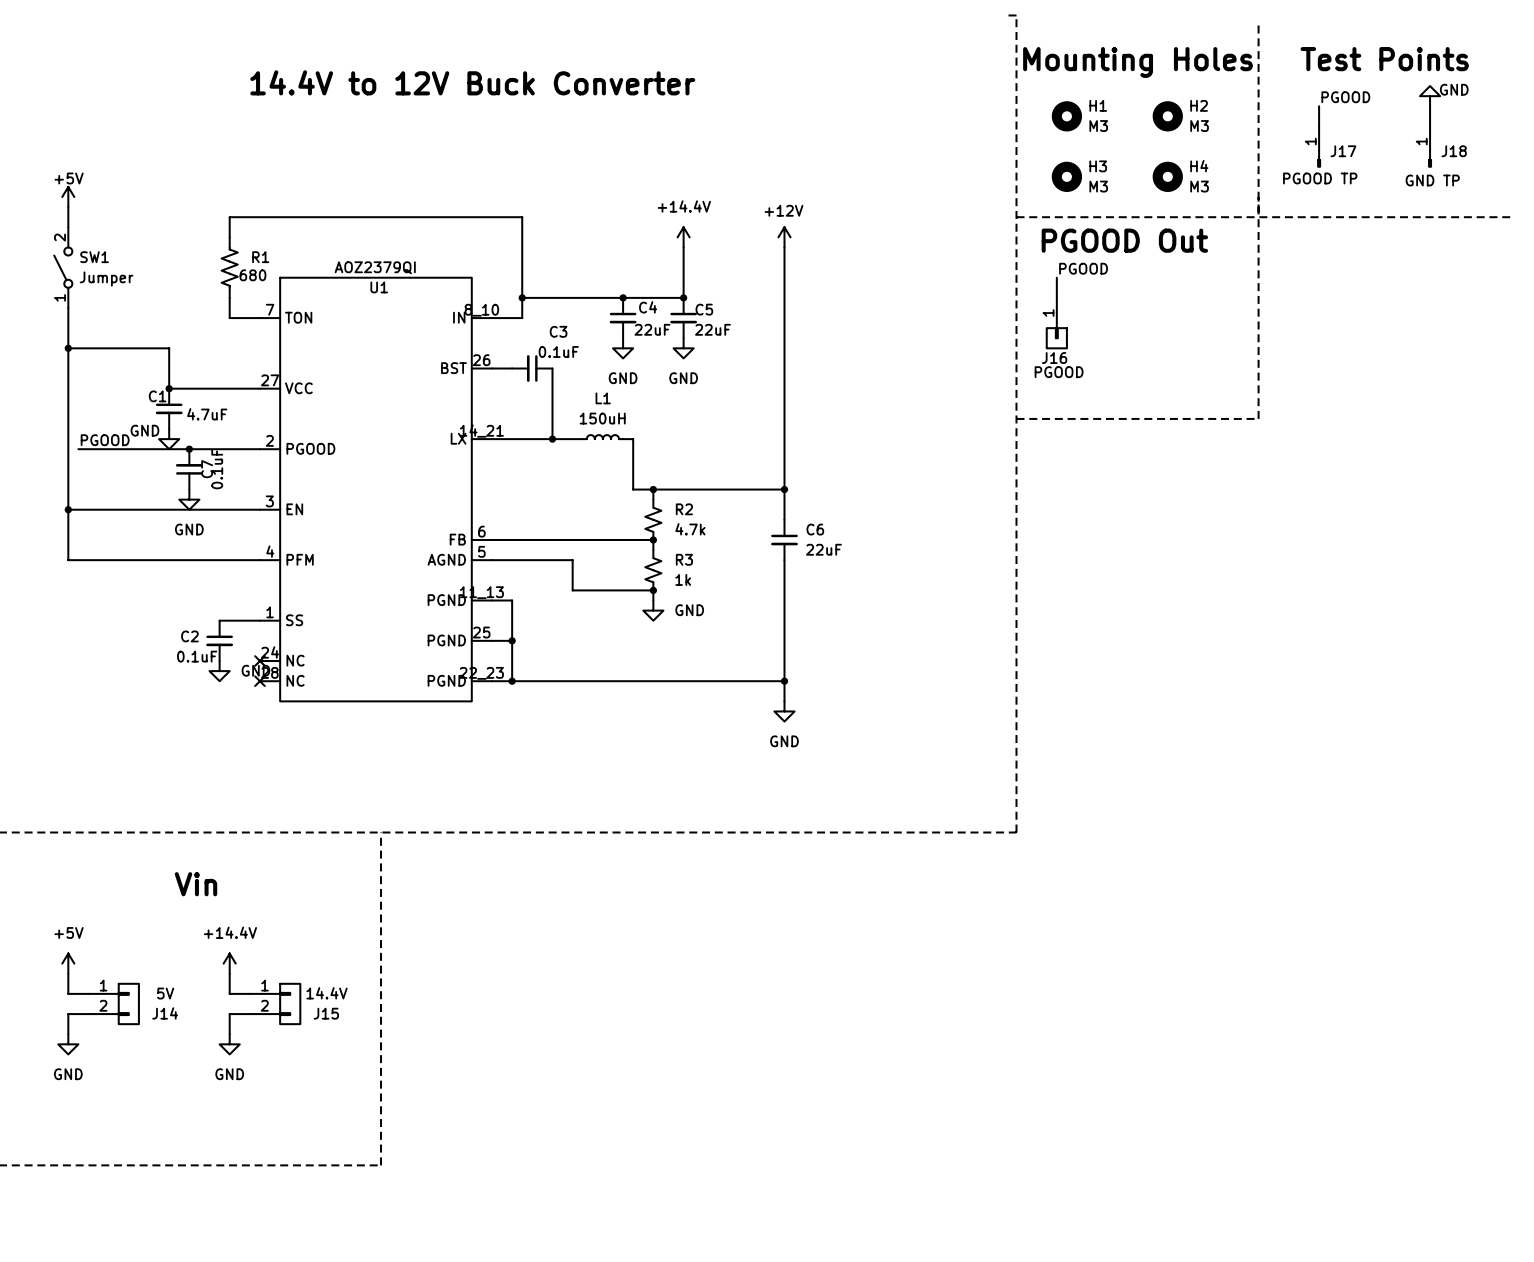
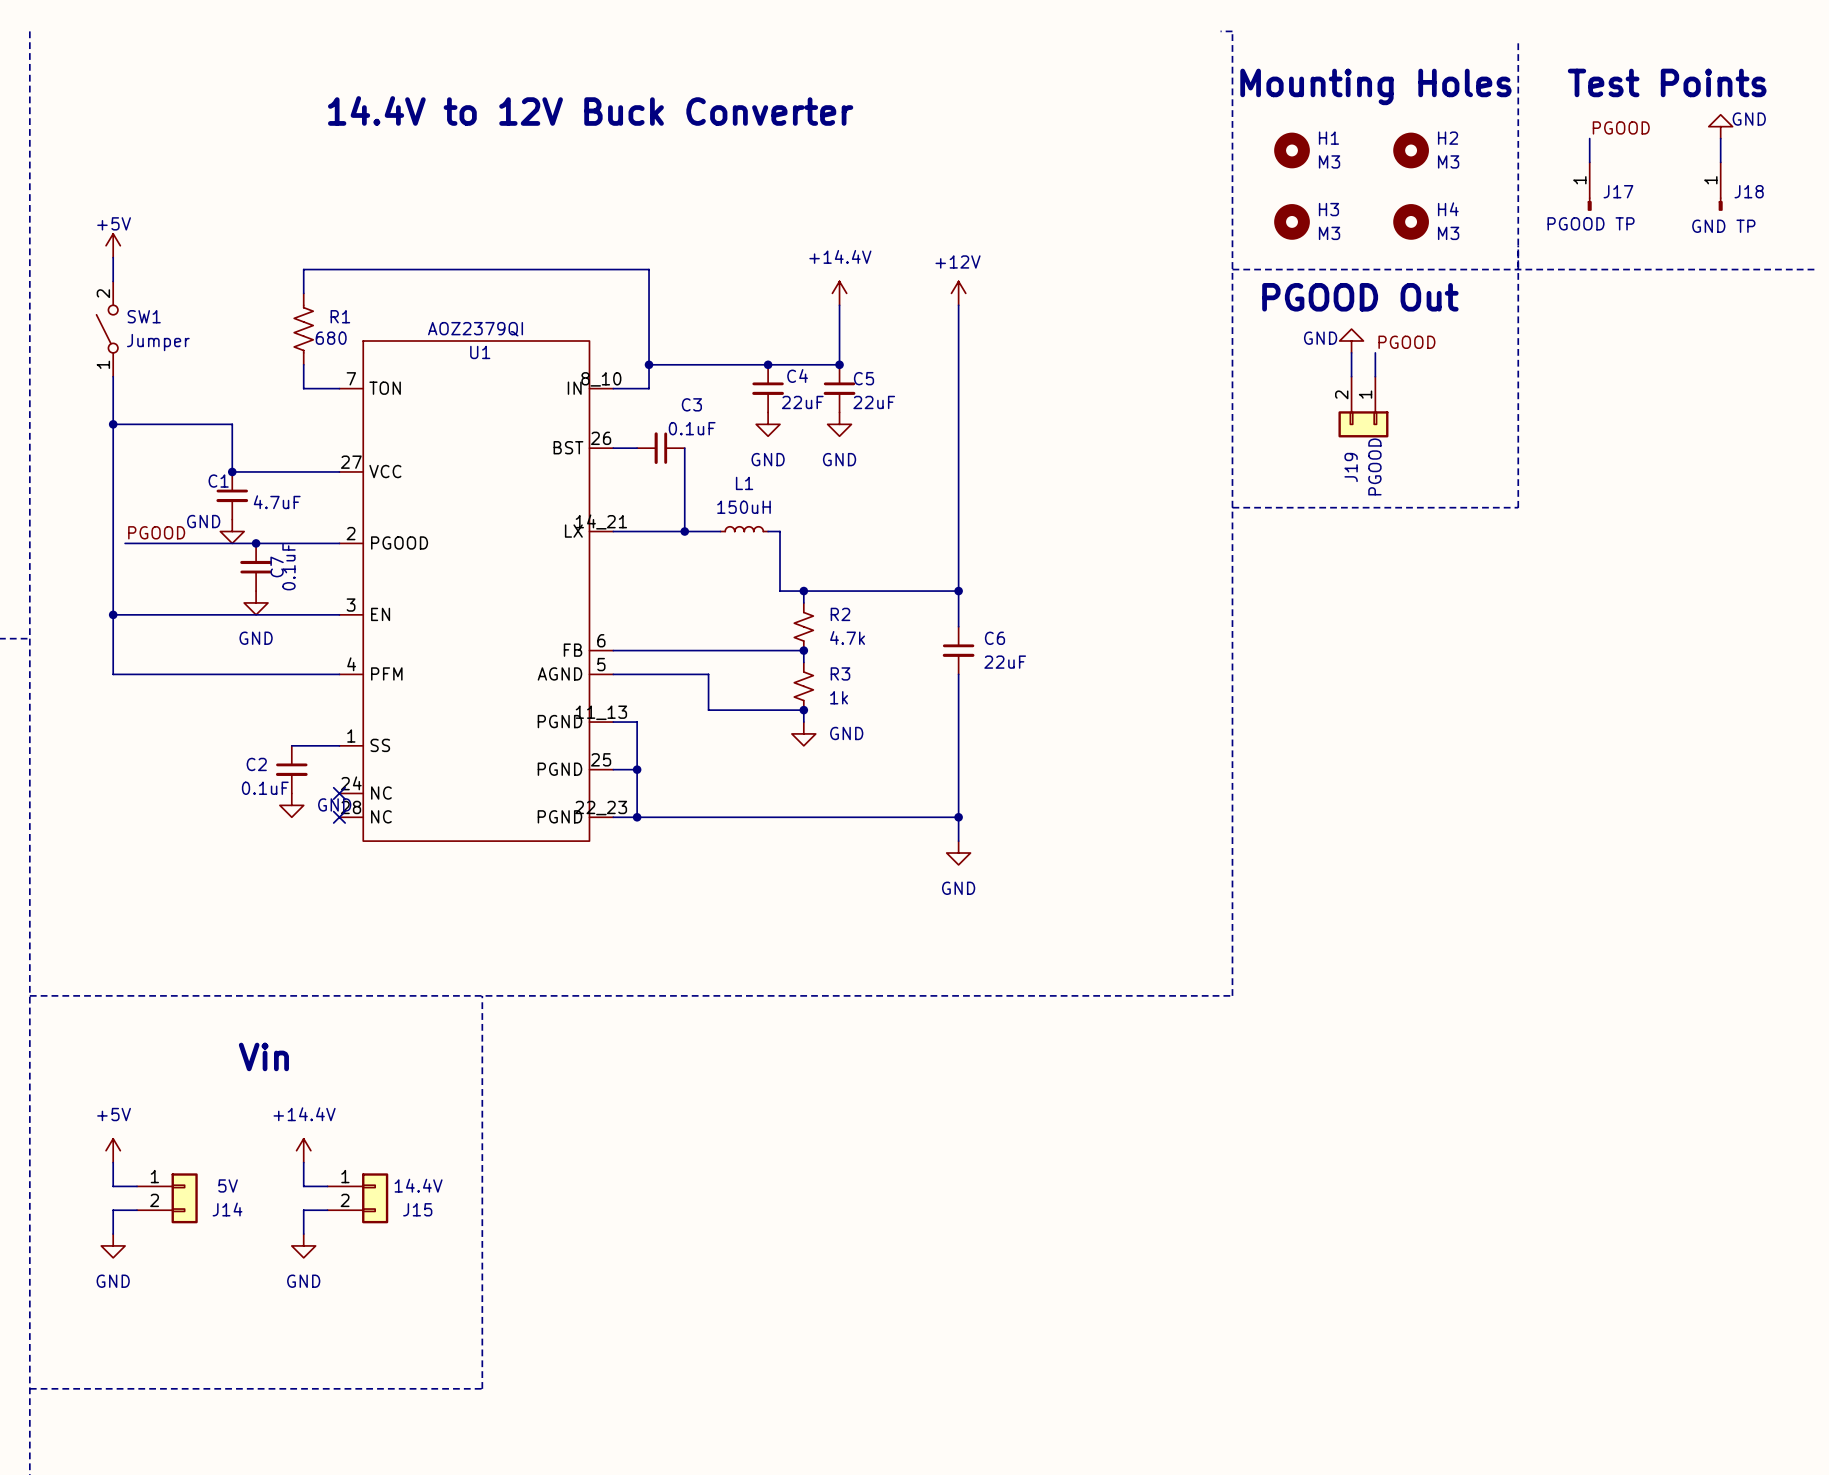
label position: PGOOD (1083, 268) -> PGOOD (1406, 342)
wire: (1056, 277) (1056, 297) -> (1351, 352) (1351, 376)
power symbol: none -> GND (1351, 340)
wire: none -> (1375, 352) (1375, 376)
J16: PGOOD (1056, 323) -> none
J19: none -> PGOOD (1363, 407)

